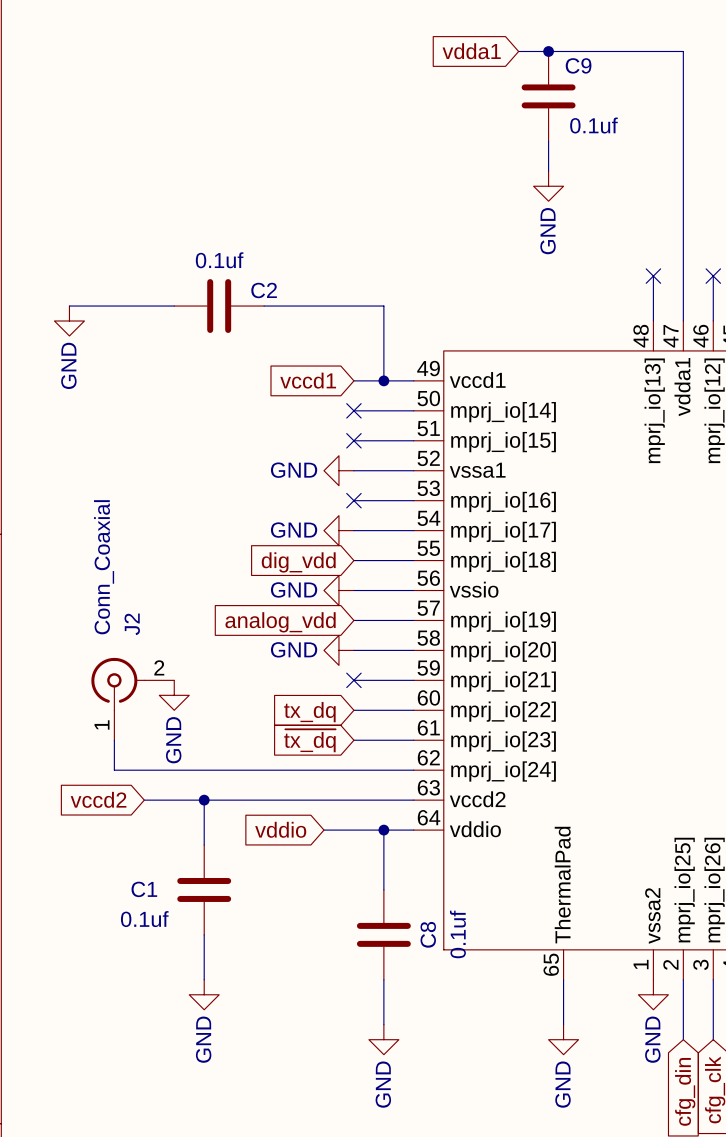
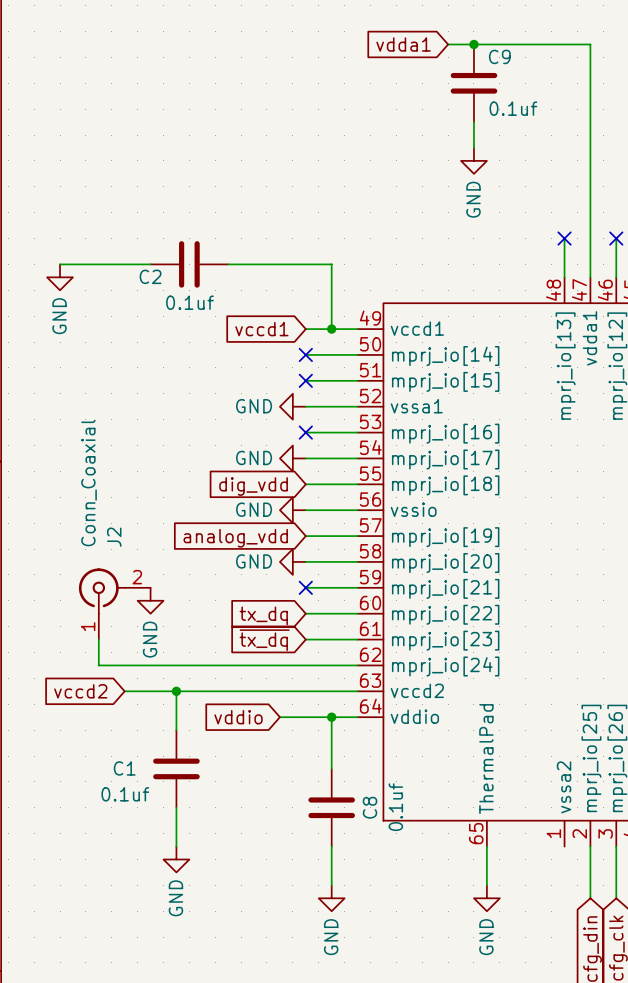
C2 value position: 0.1uf (219, 260) -> 0.1uf (189, 302)
C2 name position: C2 (264, 290) -> C2 (150, 276)
power symbol: GND (653, 994) -> none

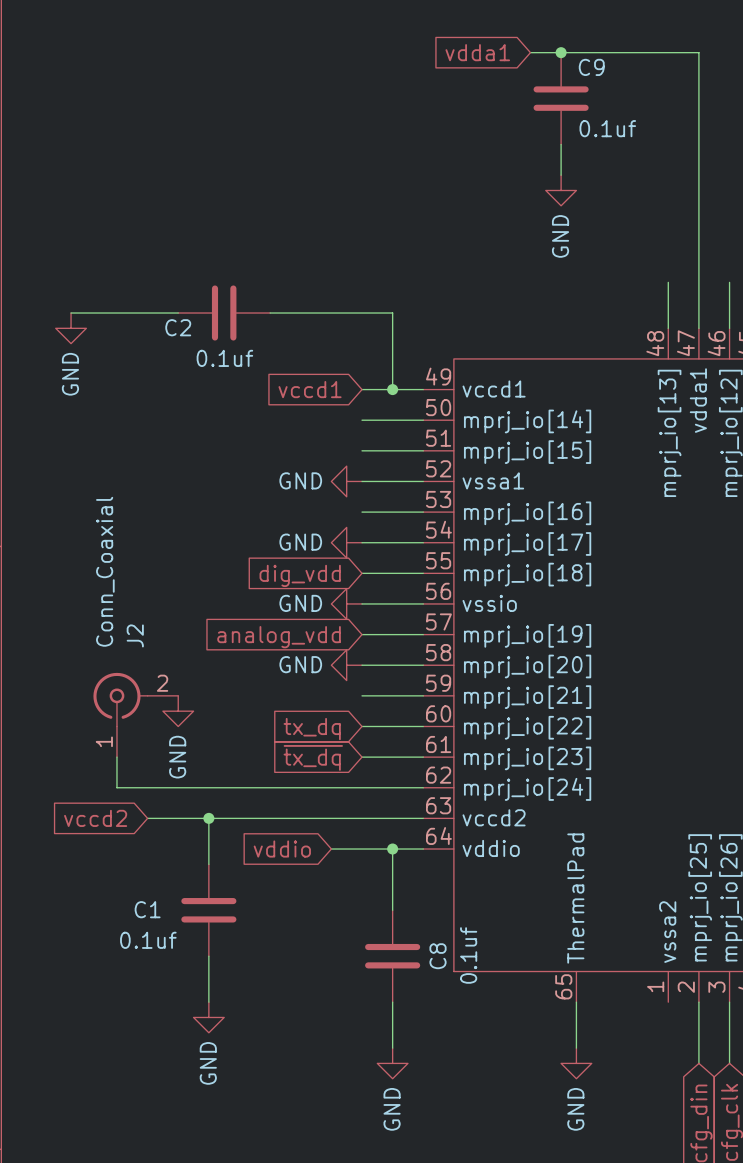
no-connect mark: (564, 238) -> none
no-connect mark: (616, 238) -> none
no-connect mark: (305, 354) -> none
no-connect mark: (305, 380) -> none
no-connect mark: (305, 432) -> none
no-connect mark: (305, 587) -> none

